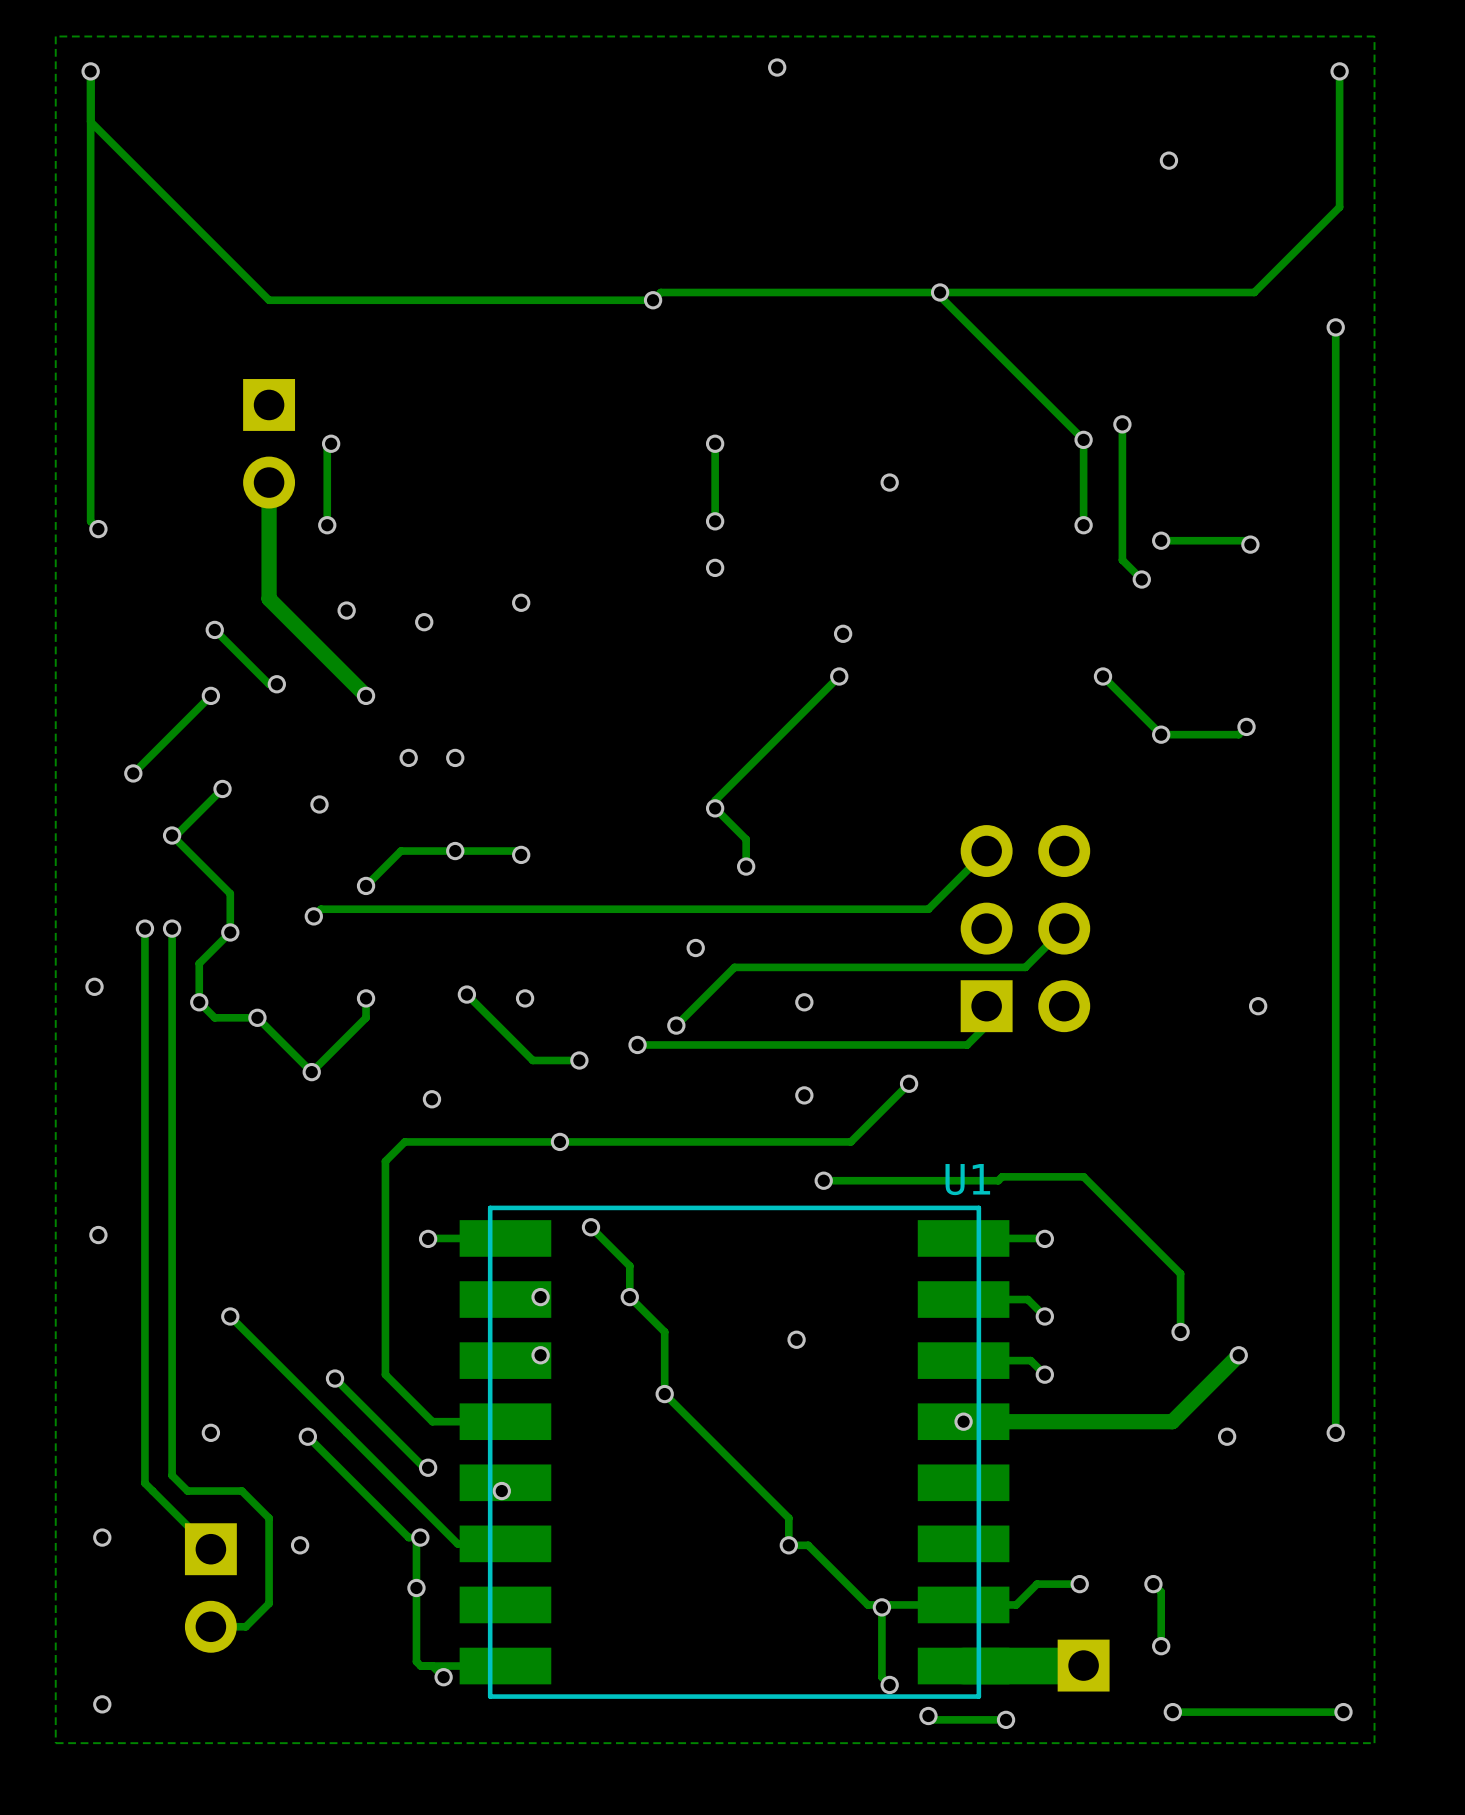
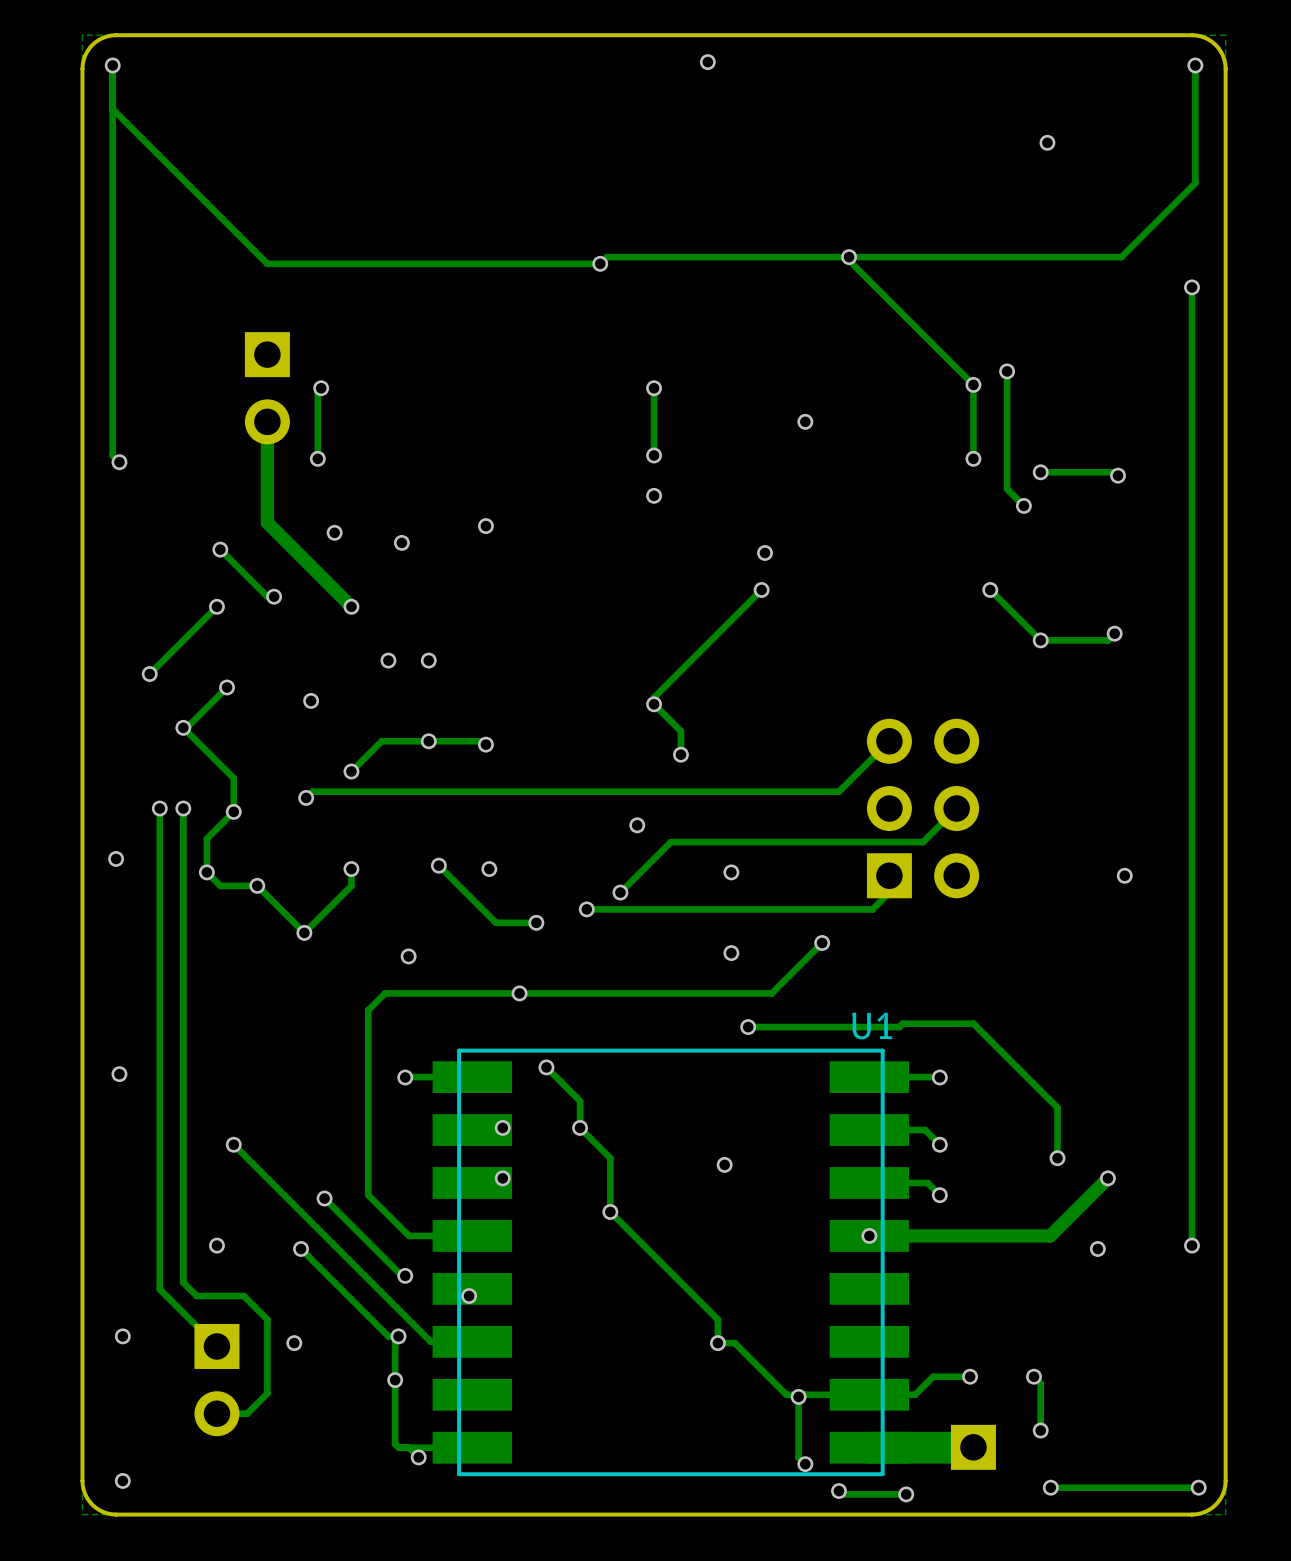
board edge: none -> (1192, 35) (116, 35) (99, 39) (89, 48) (83, 60) (82, 68) (82, 1480) (85, 1493) (95, 1507) (103, 1512) (116, 1514) (1192, 1514) (1208, 1510) (1218, 1501) (1224, 1489) (1225, 1480) (1225, 68) (1223, 55) (1215, 45) (1204, 37) (1192, 35)

